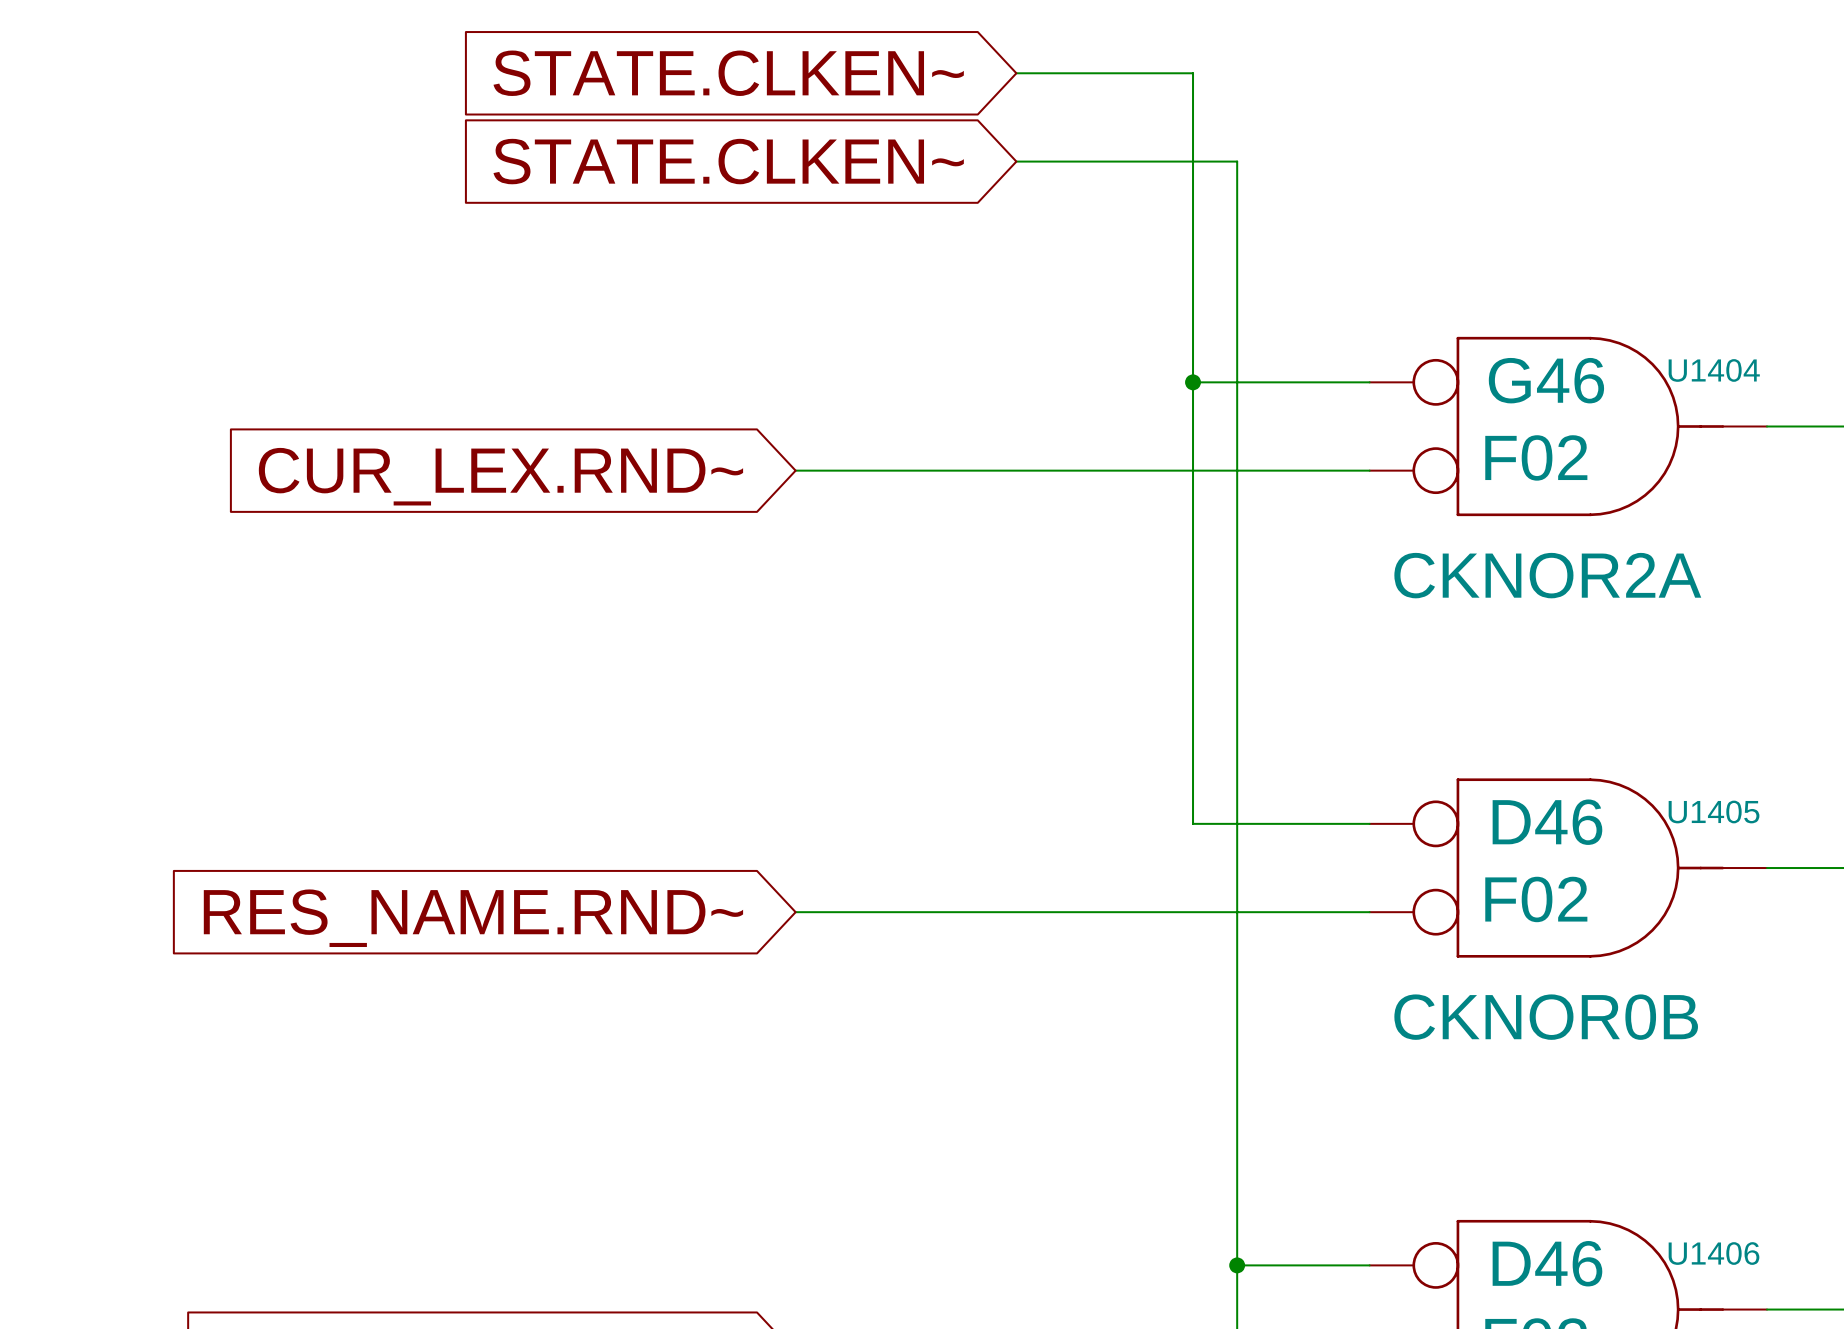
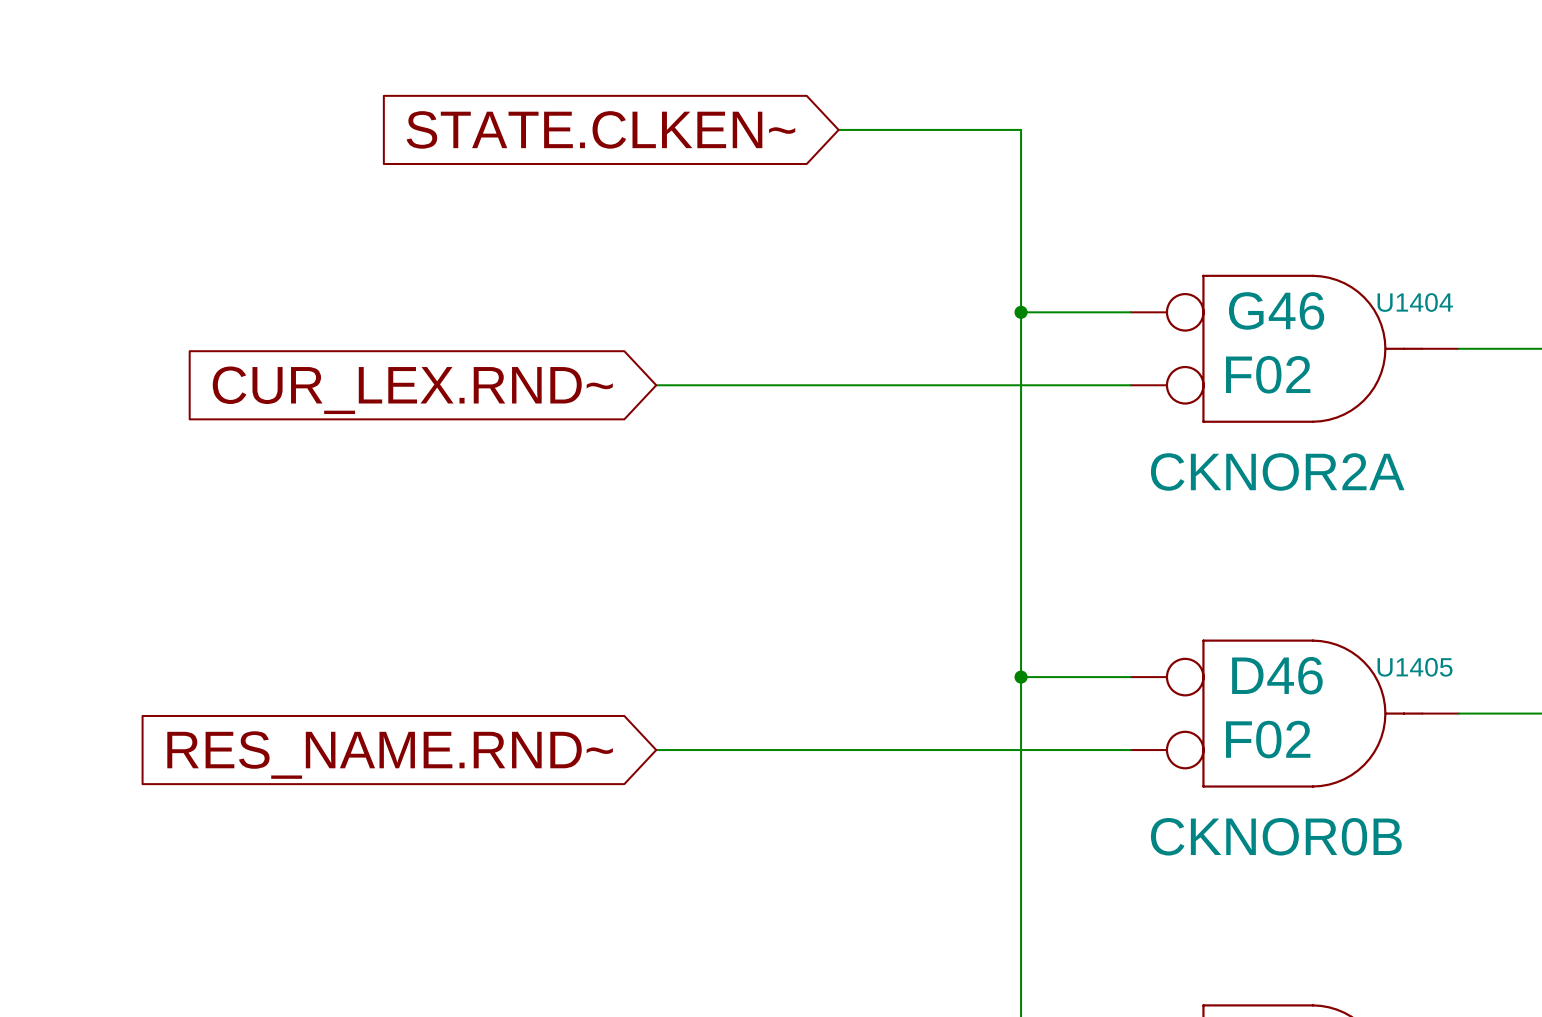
global label: STATE.CLKEN~ (728, 73) -> none
wire: (1016, 73) (1193, 73) (1193, 823) (1237, 823) -> none
wire: (1193, 382) (1237, 382) -> none
junction position: (1193, 382) -> (1021, 312)
junction: none -> (1021, 677)

